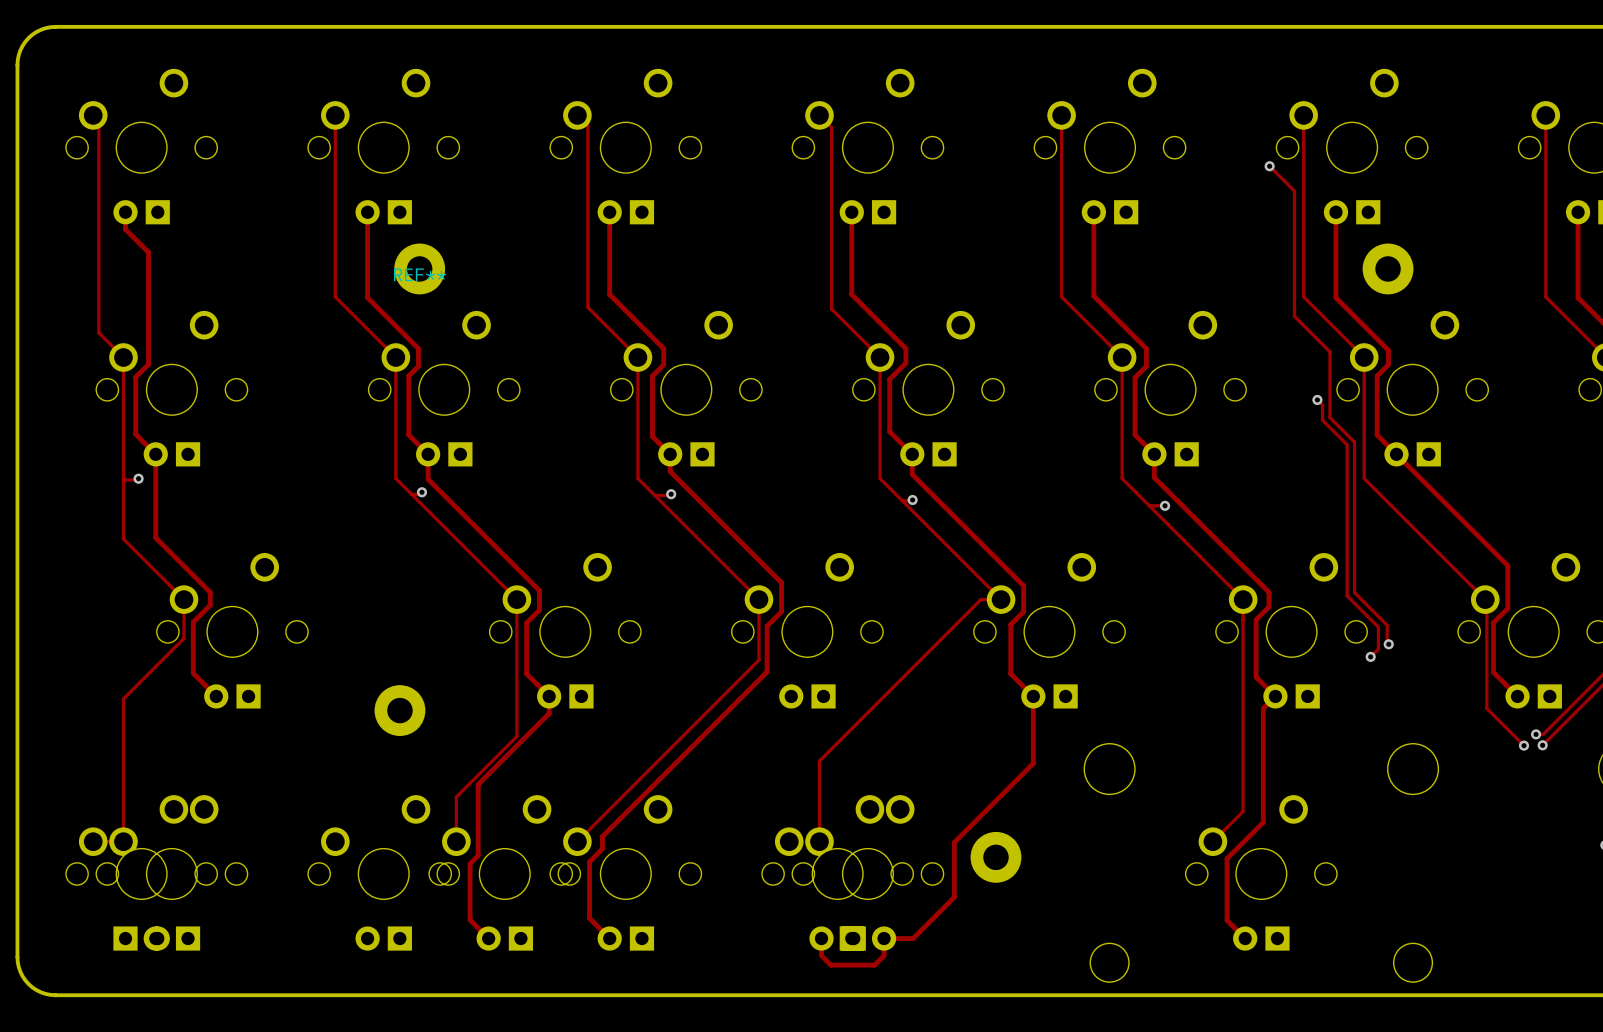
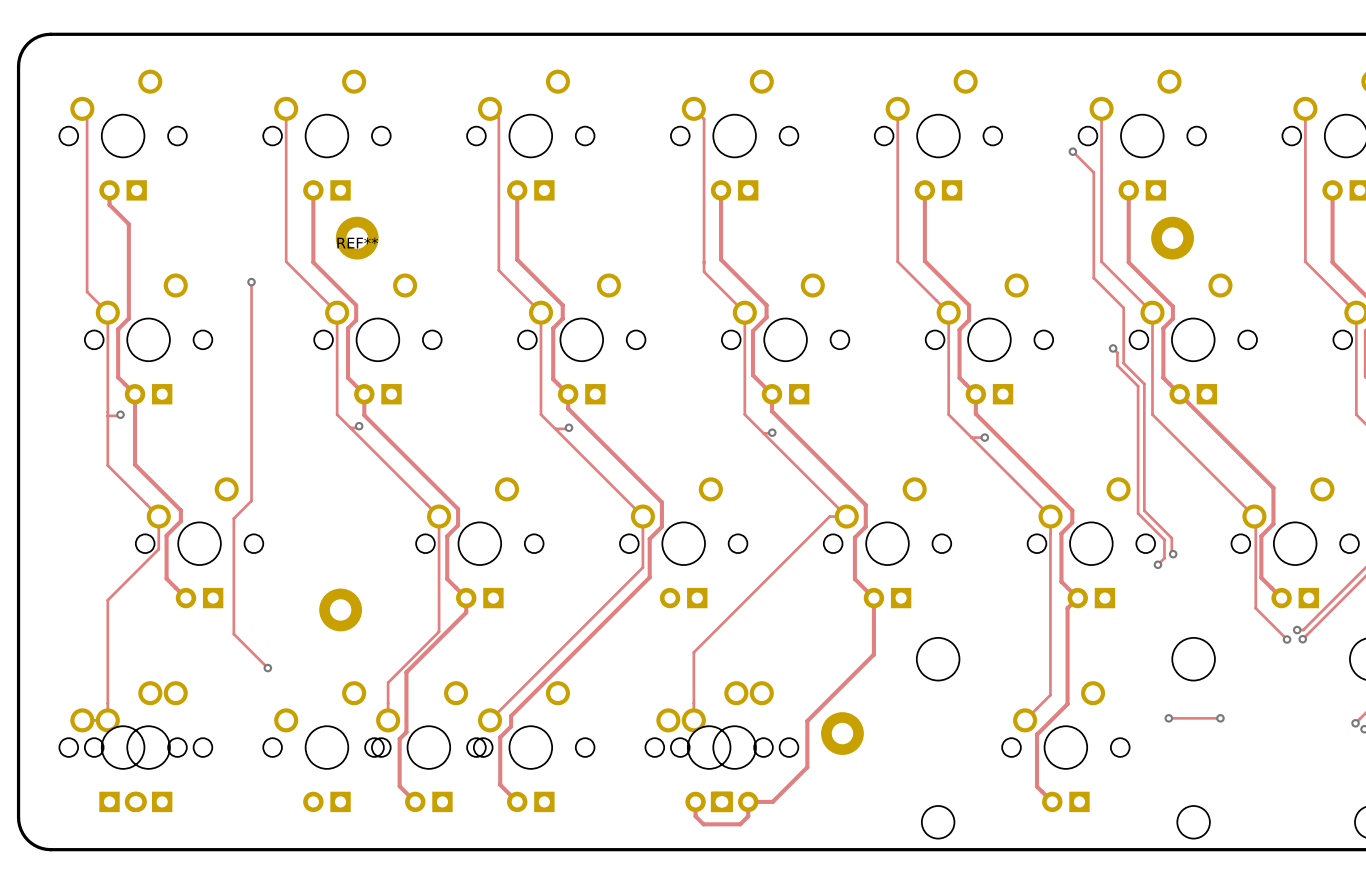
track: none -> (251, 282) (251, 500) (233, 518) (233, 634) (267, 668)
via: none -> (251, 282)
via: none -> (267, 668)
track: none -> (1168, 718) (1220, 718)
via: none -> (1168, 718)
via: none -> (1220, 718)

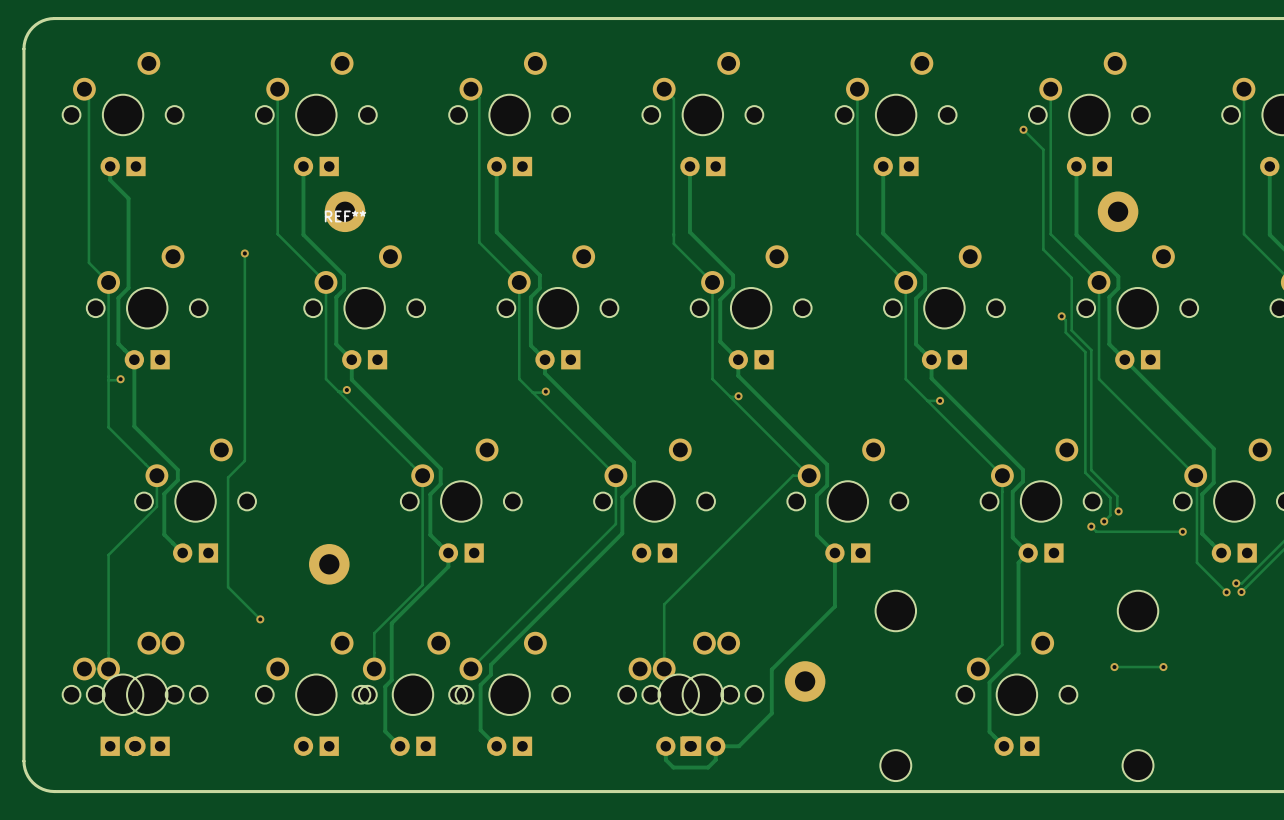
track: none -> (1091, 526) (1096, 531) (1182, 531)
via: none -> (1091, 526)
via: none -> (1182, 531)

